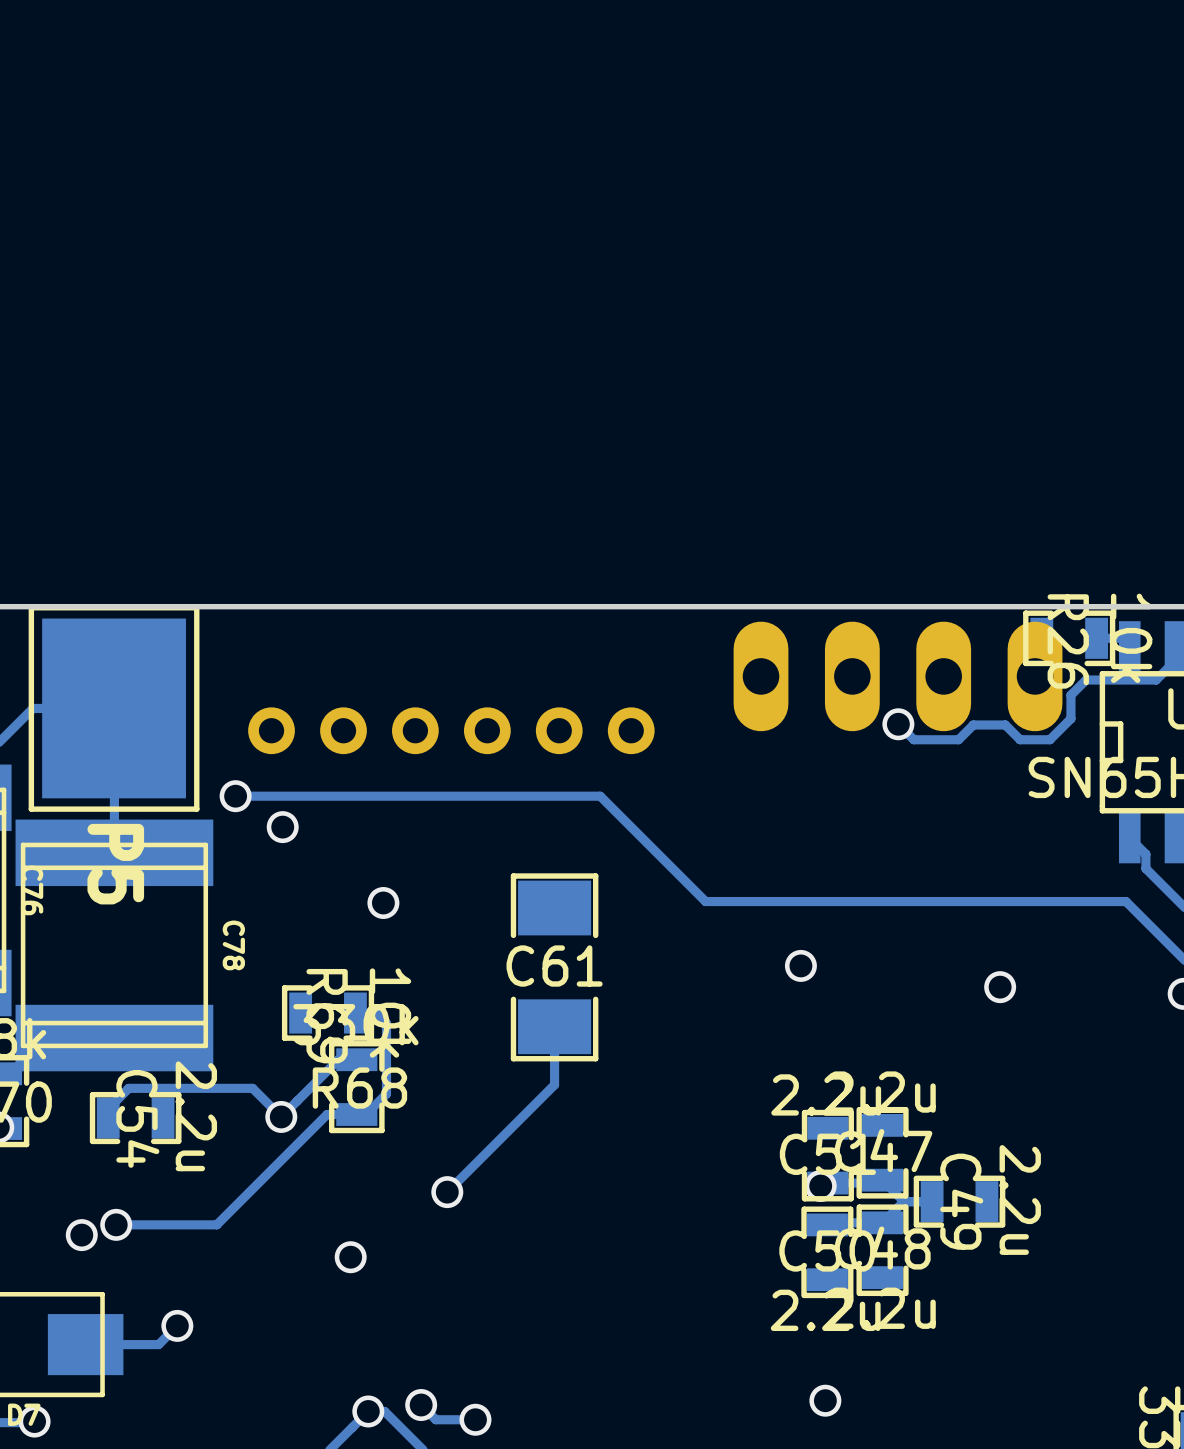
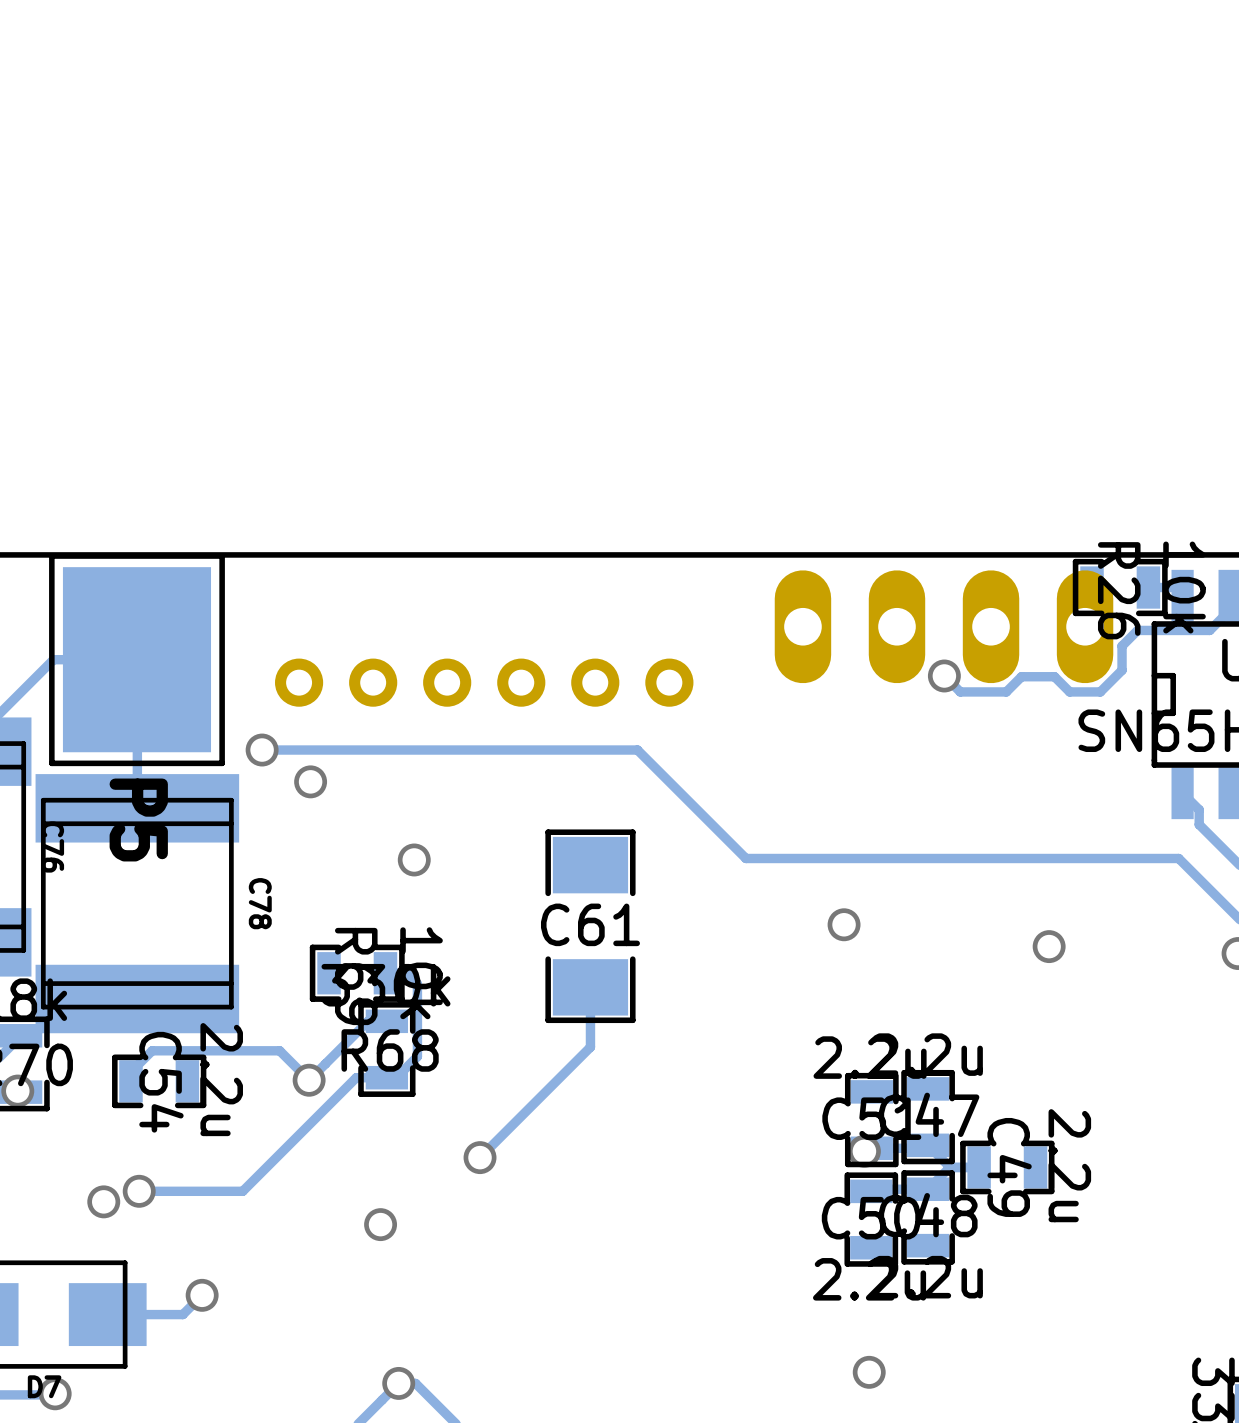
track: (421, 1405) (435, 1419) (475, 1419) -> none
via: (421, 1405) -> none
via: (475, 1419) -> none

